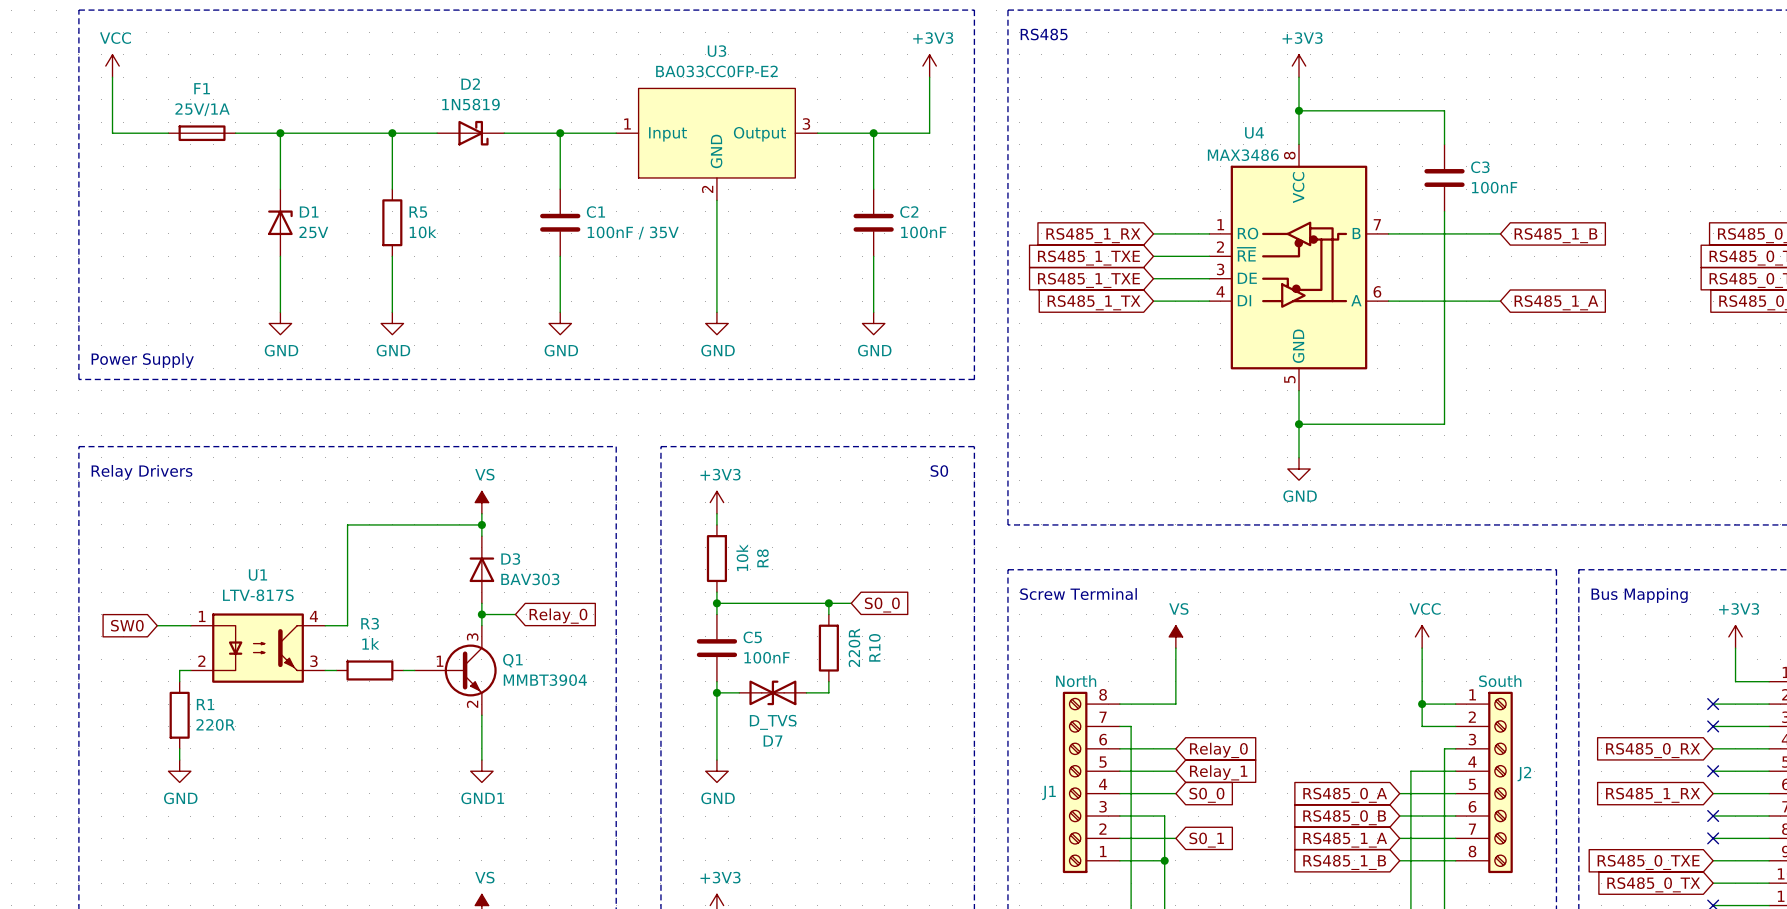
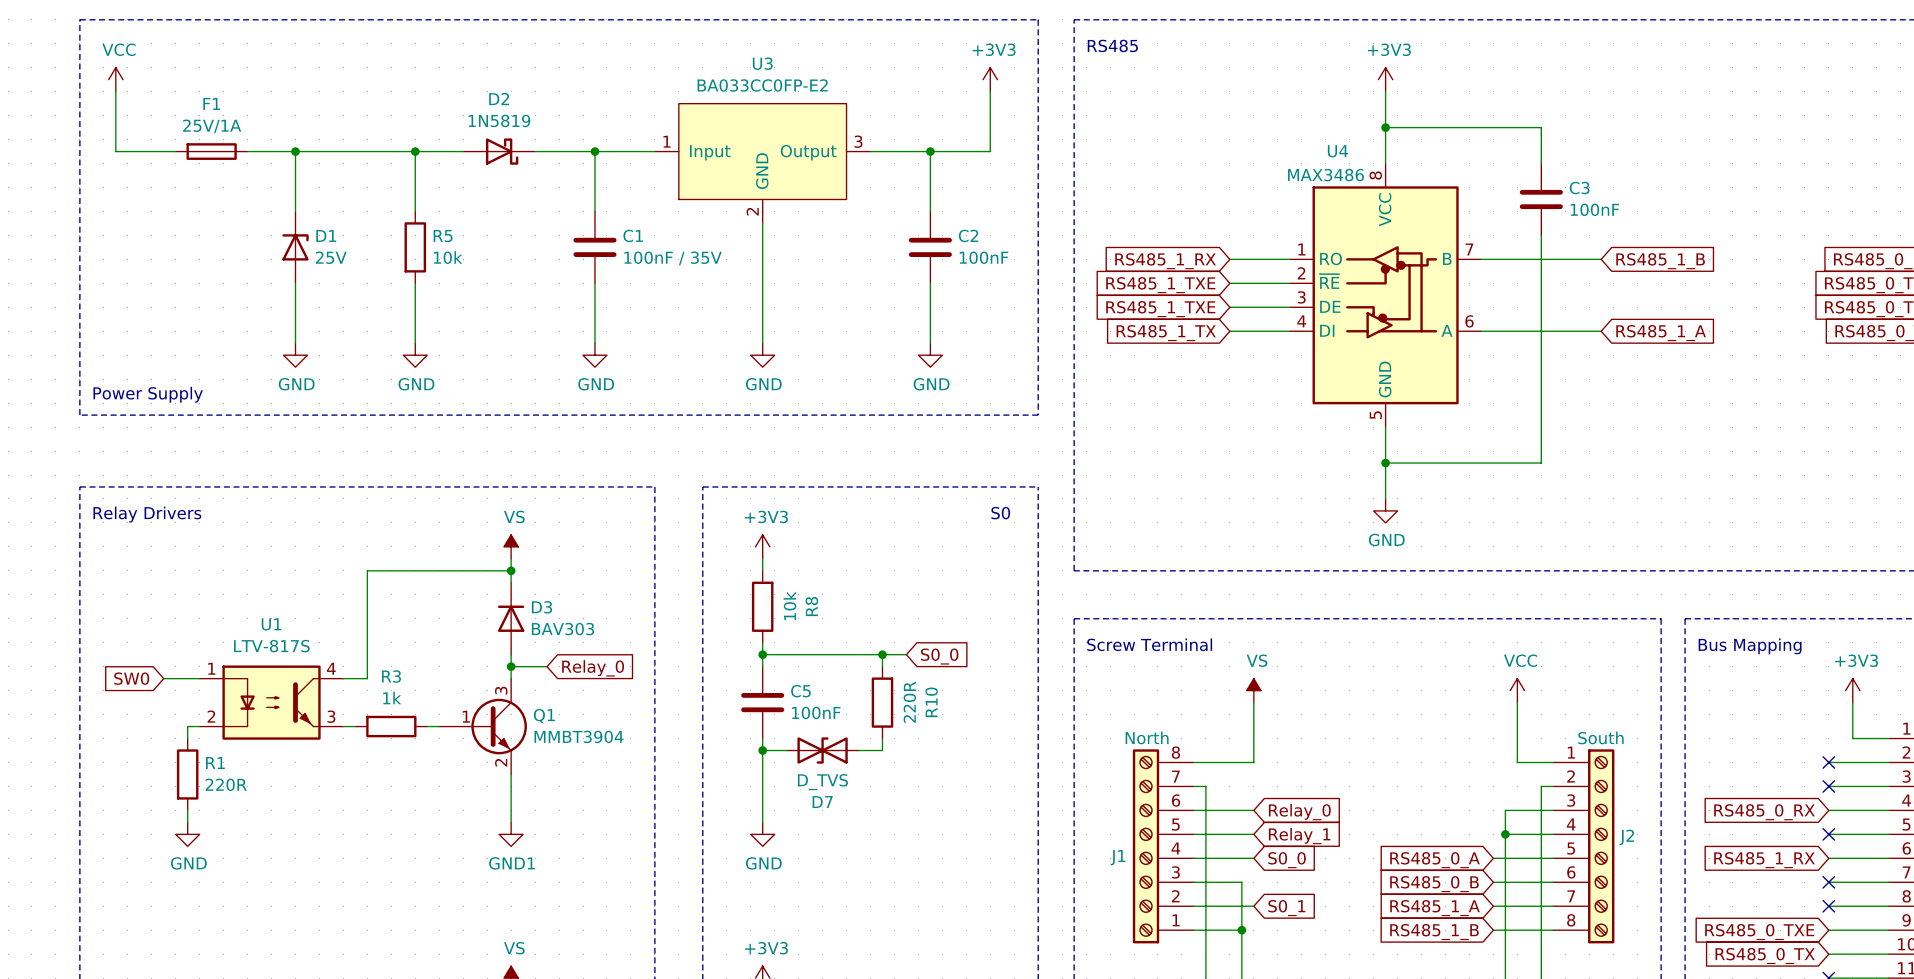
wire: (1422, 704) (1422, 726) (1444, 726) -> (1505, 834) (1505, 810) (1541, 810) (1541, 786)
junction: (1422, 704) -> none
junction: none -> (1505, 834)

